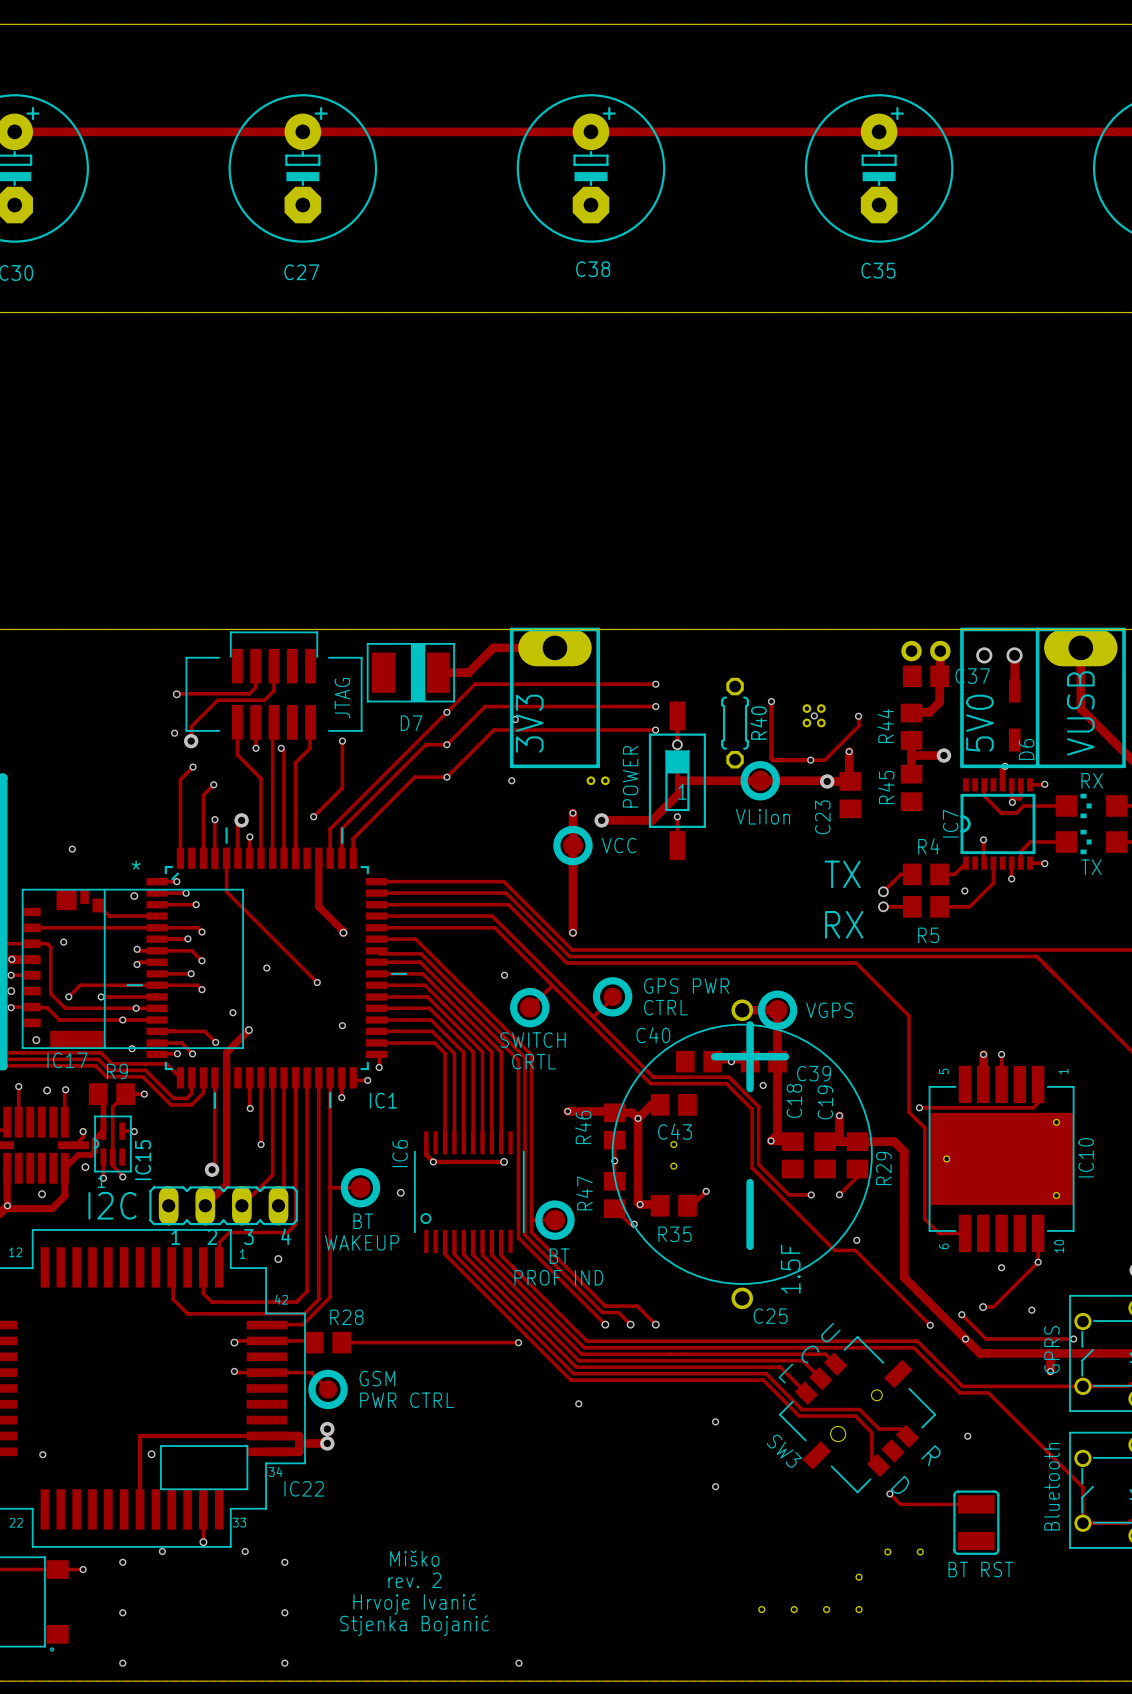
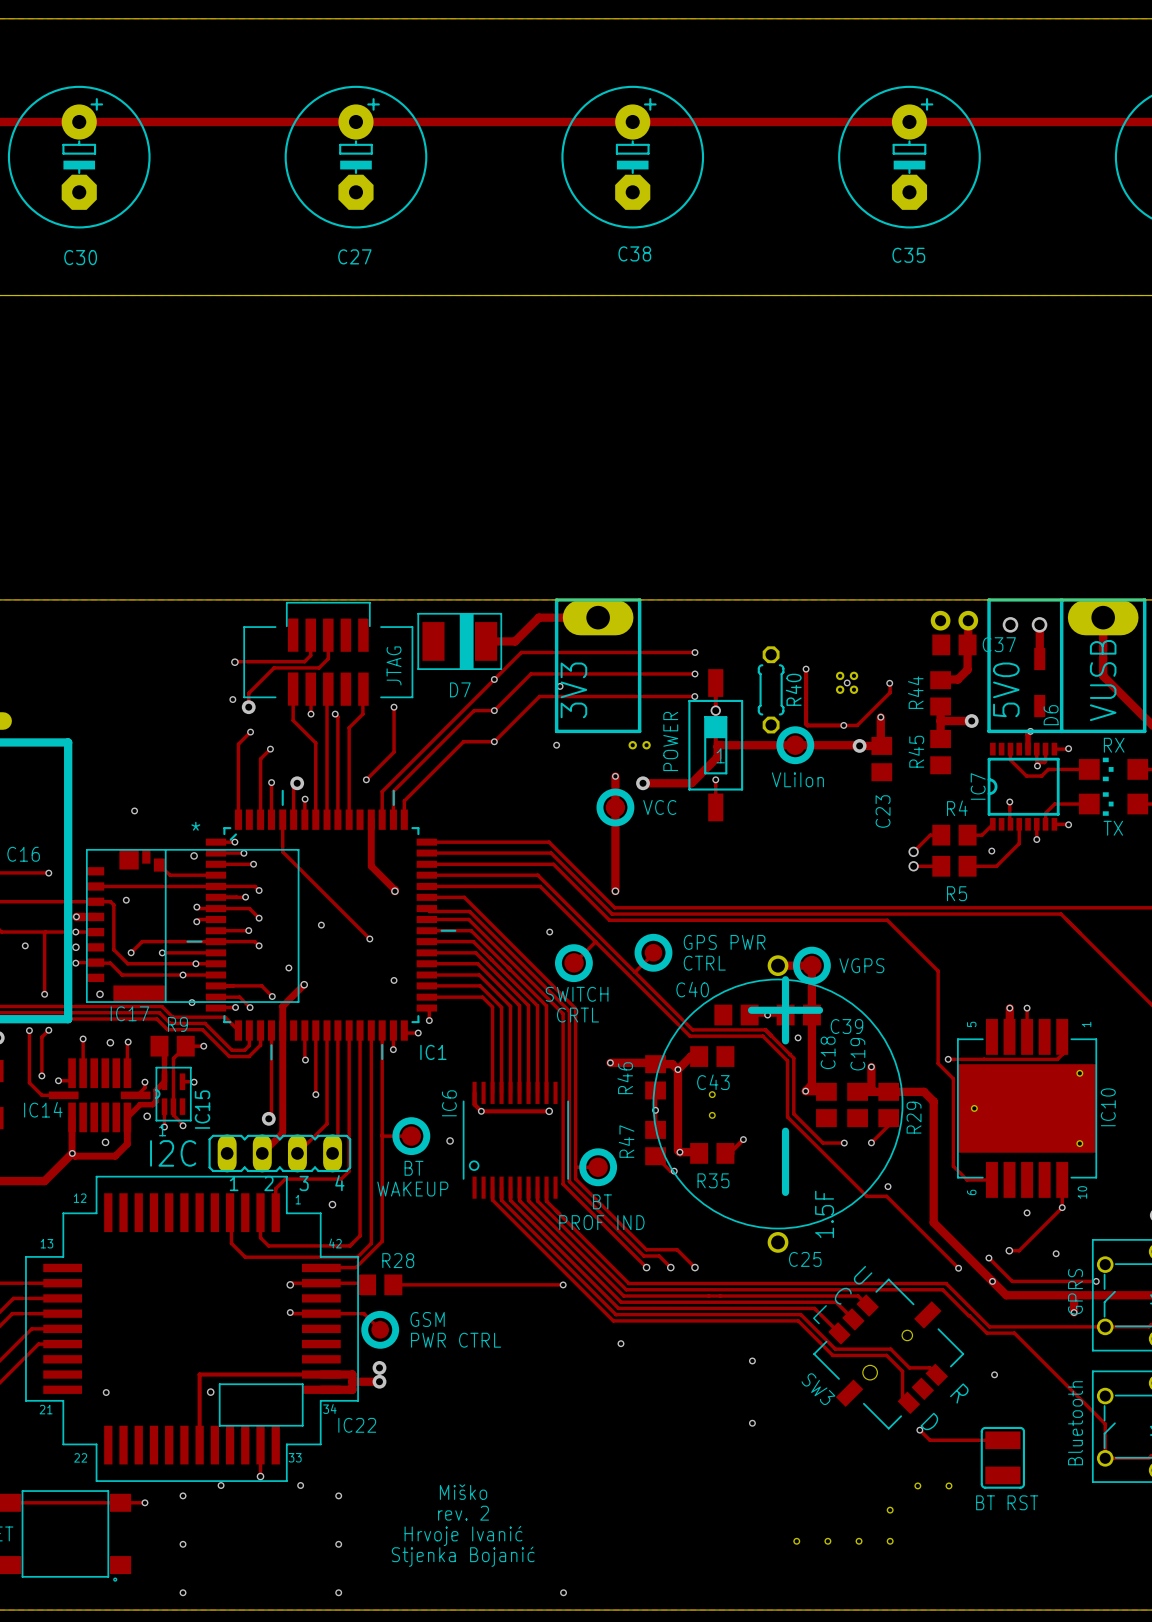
C23 name position: C23 (822, 817) -> C23 (883, 811)
text: TX (842, 874) -> none
text: RX (844, 924) -> none

